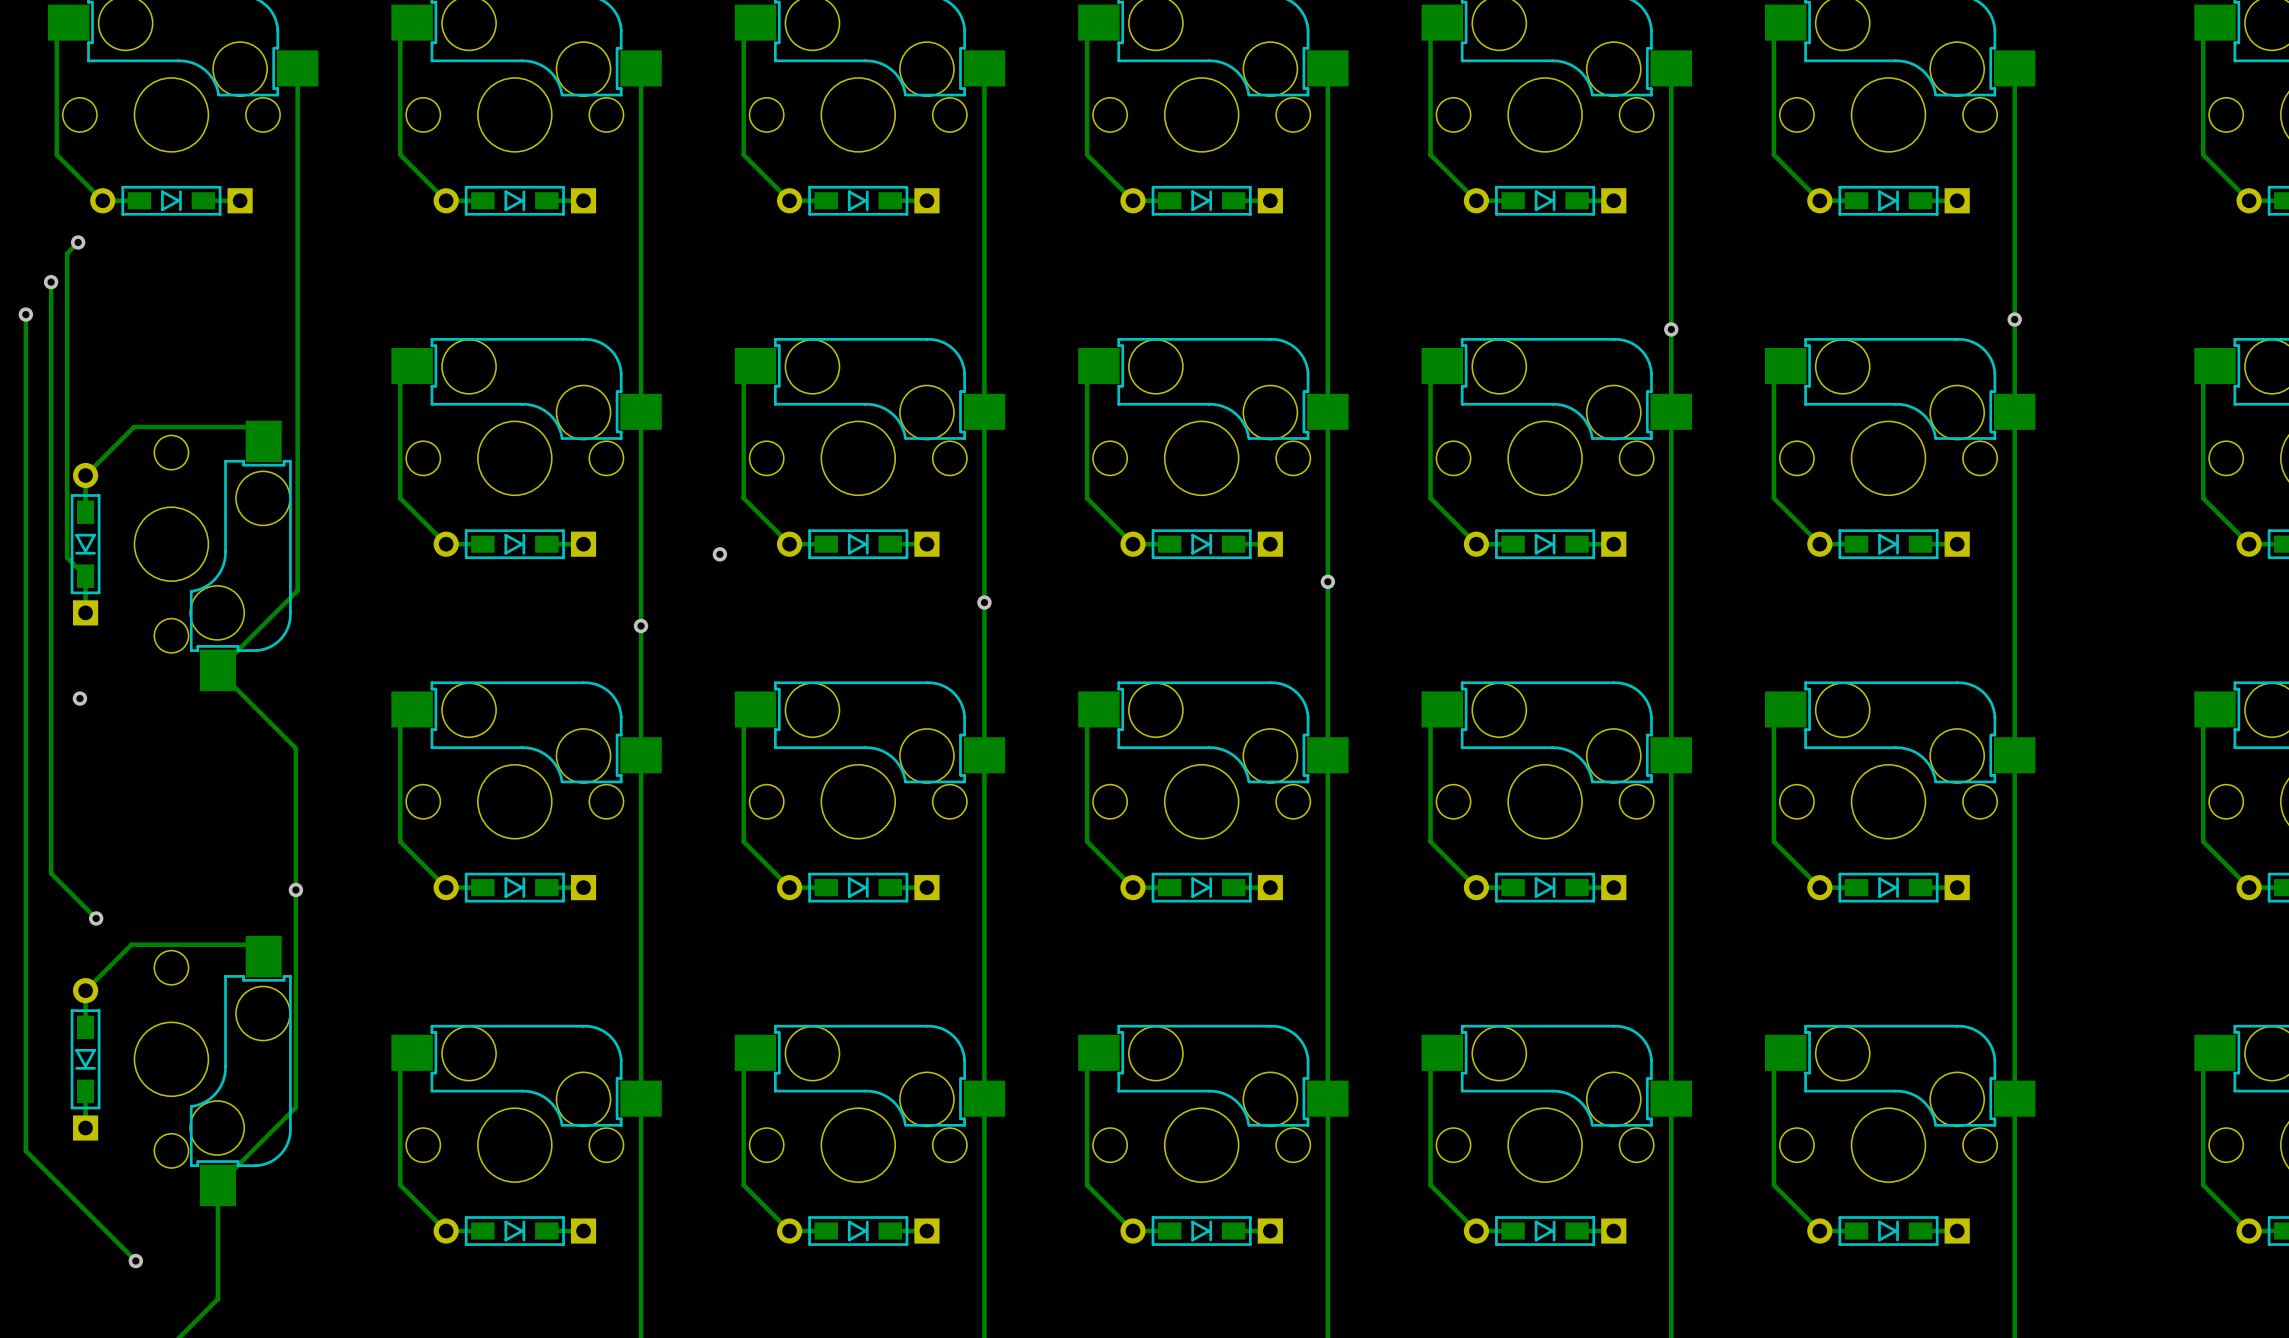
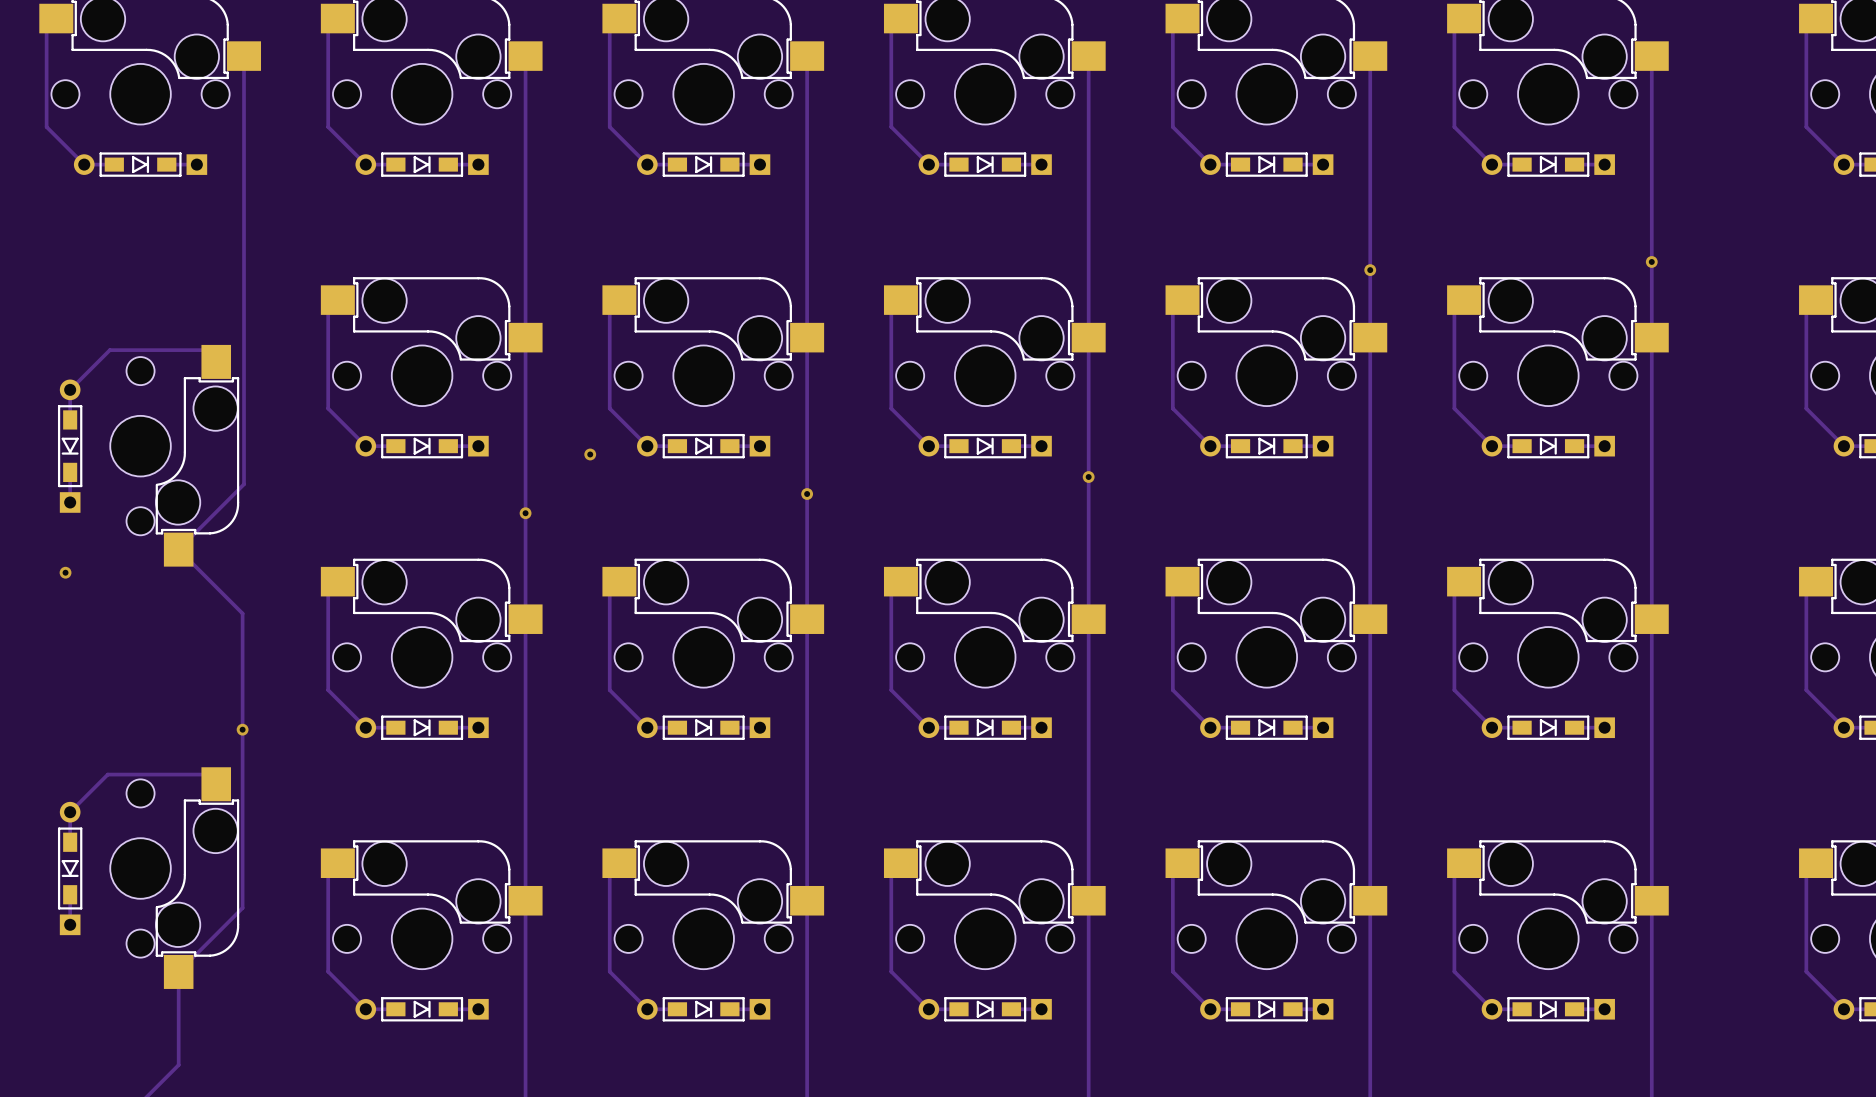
track: (78, 242) (67, 253) (67, 557) (85, 576) -> none
via: (78, 242) -> none
track: (51, 282) (51, 873) (96, 918) -> none
via: (51, 282) -> none
track: (25, 314) (25, 1151) (135, 1260) -> none
via: (25, 314) -> none
via: (96, 918) -> none
via: (135, 1260) -> none

